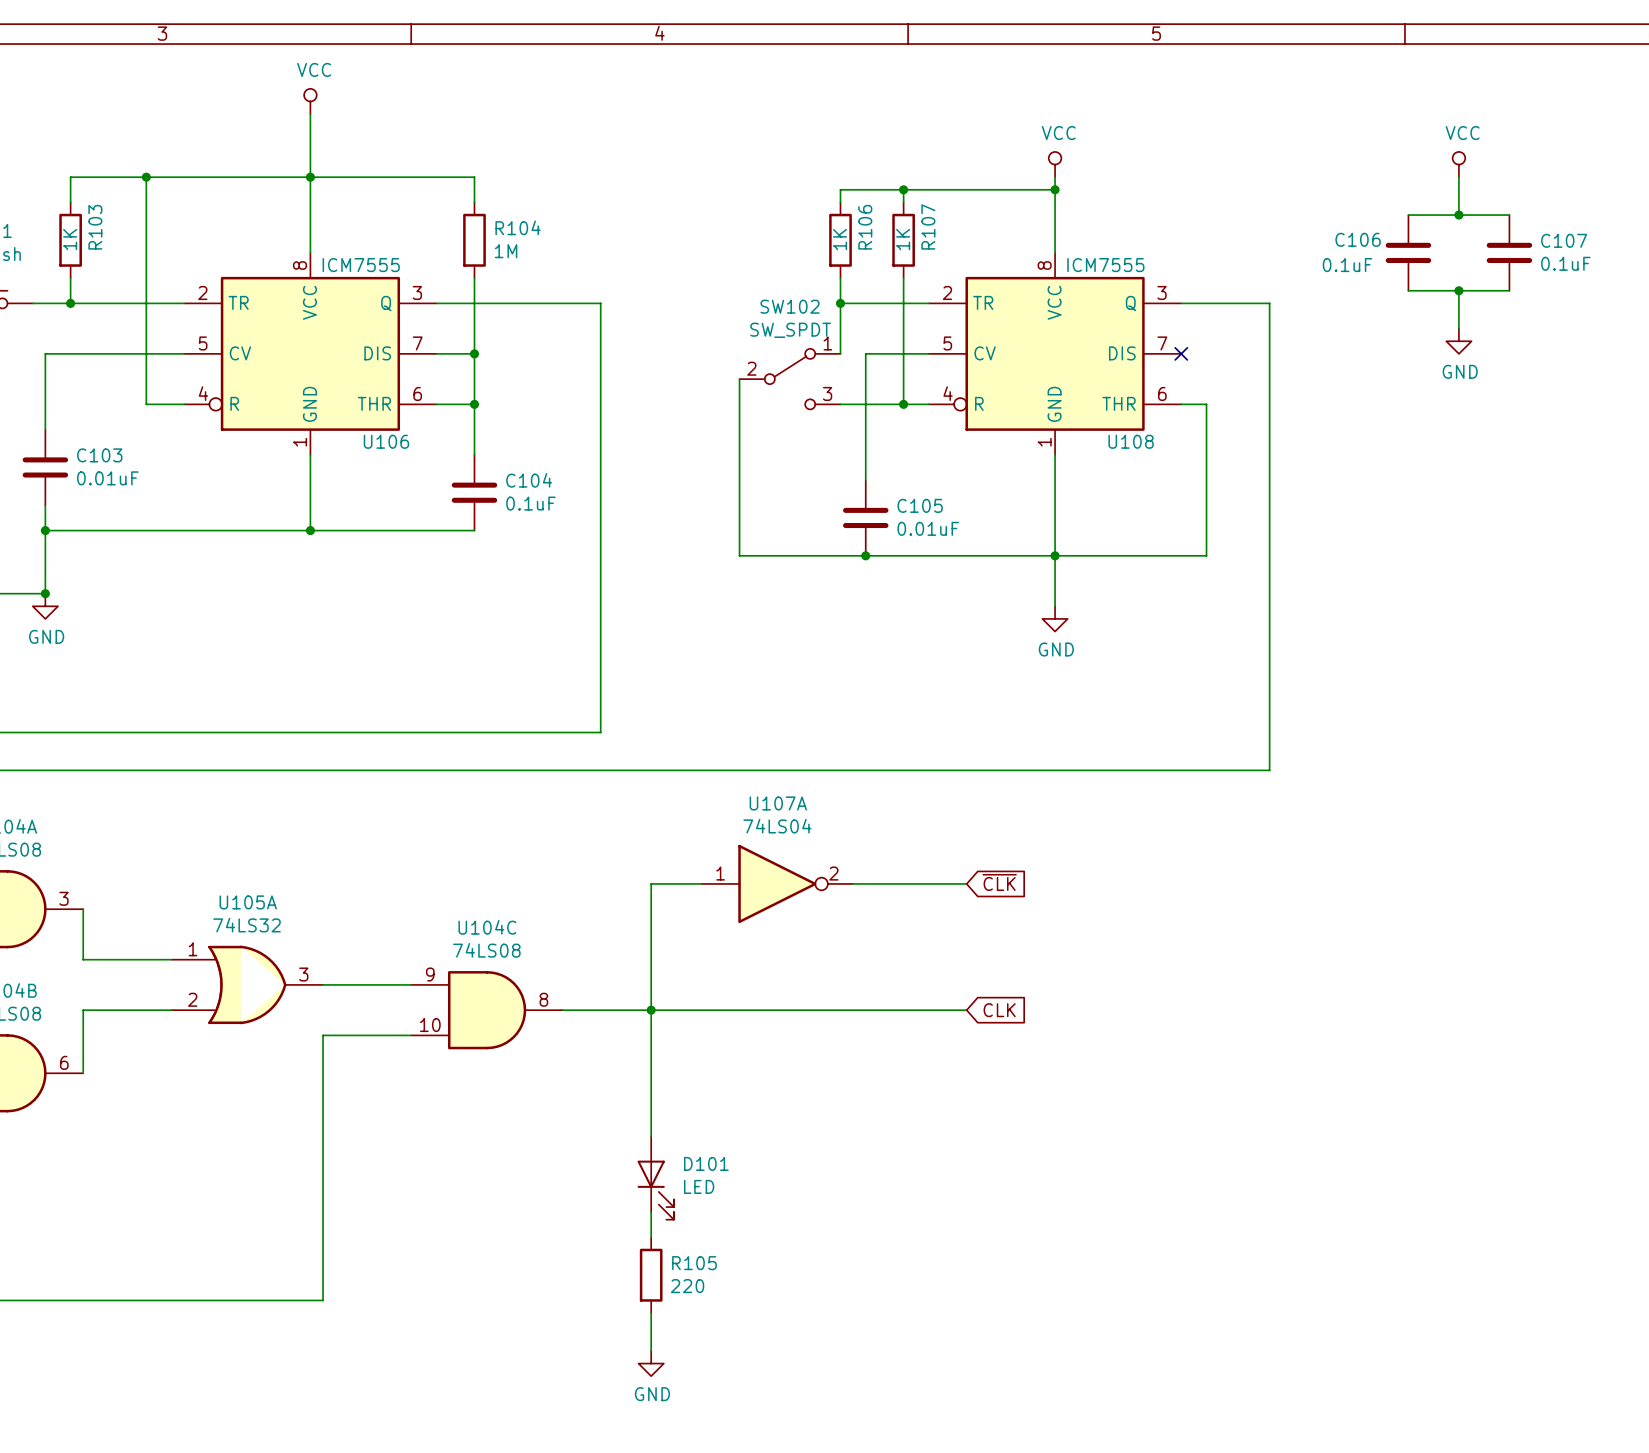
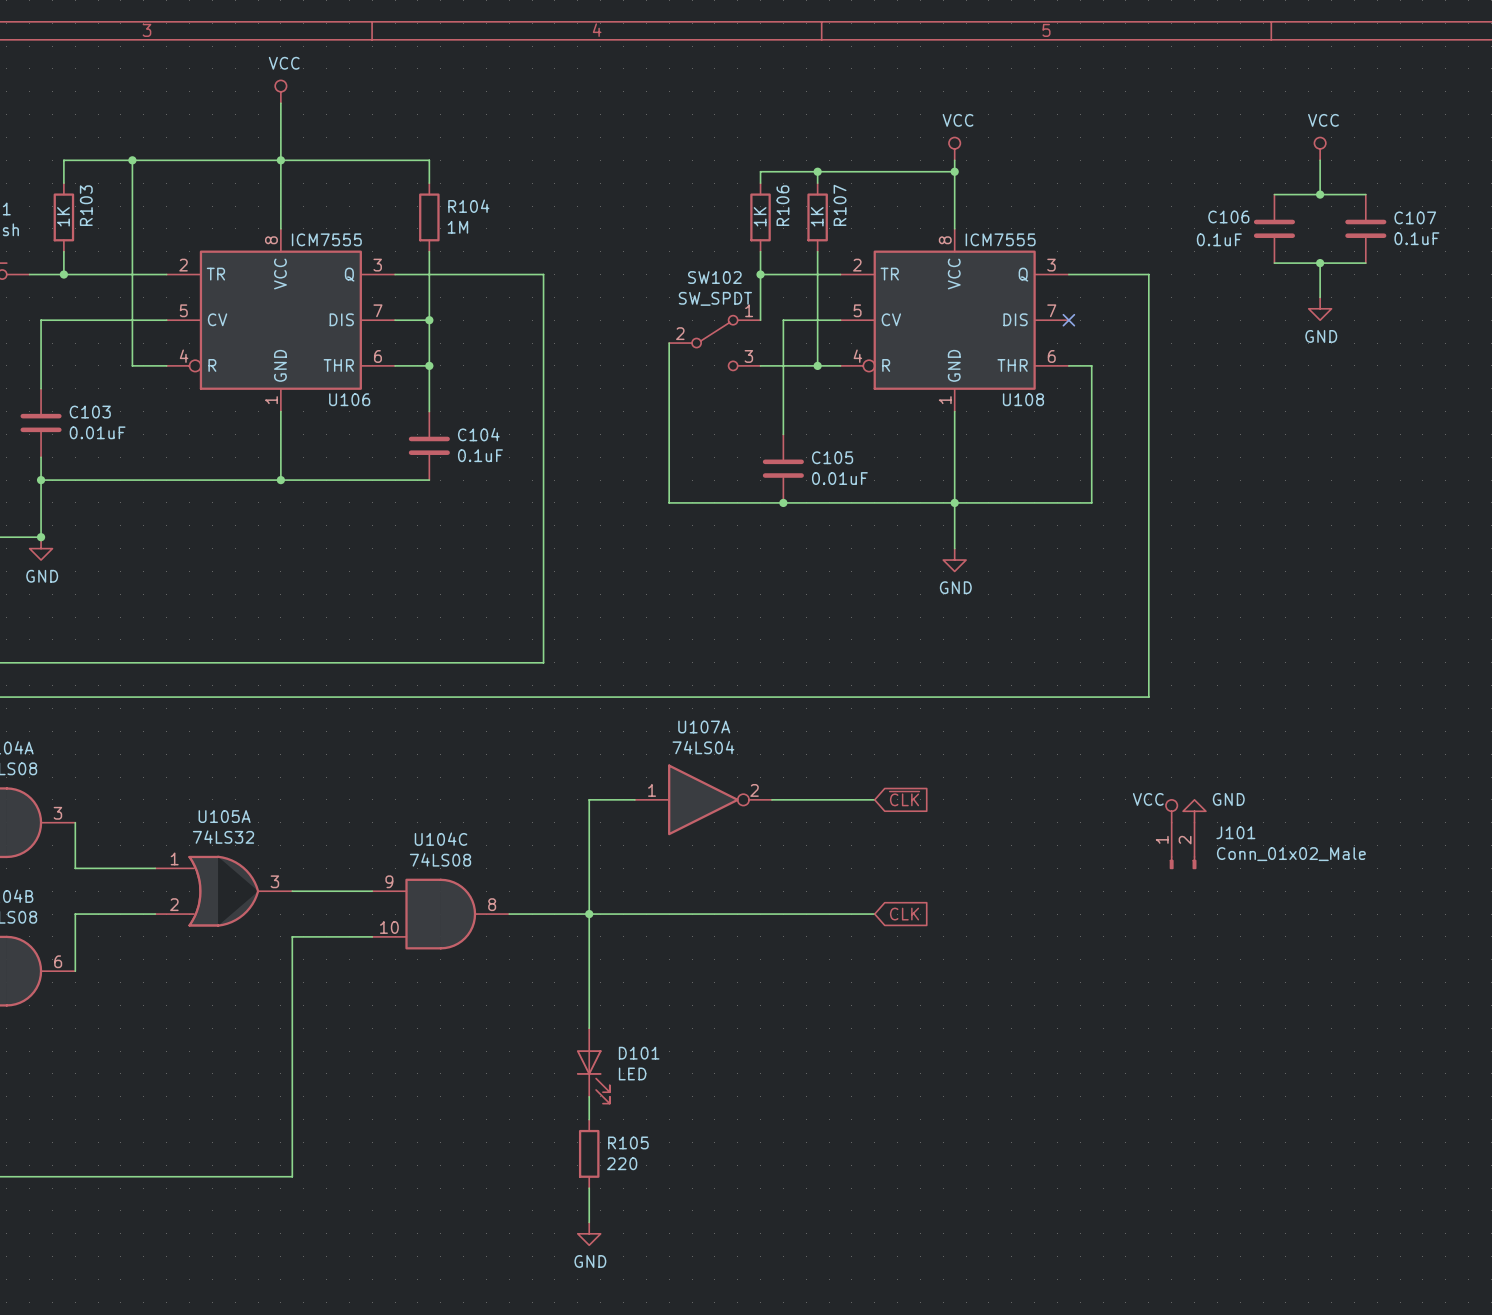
power symbol: none -> VCC (1171, 811)
power symbol: none -> GND (1194, 811)
J101: none -> Conn_01x02_Male (1183, 845)

